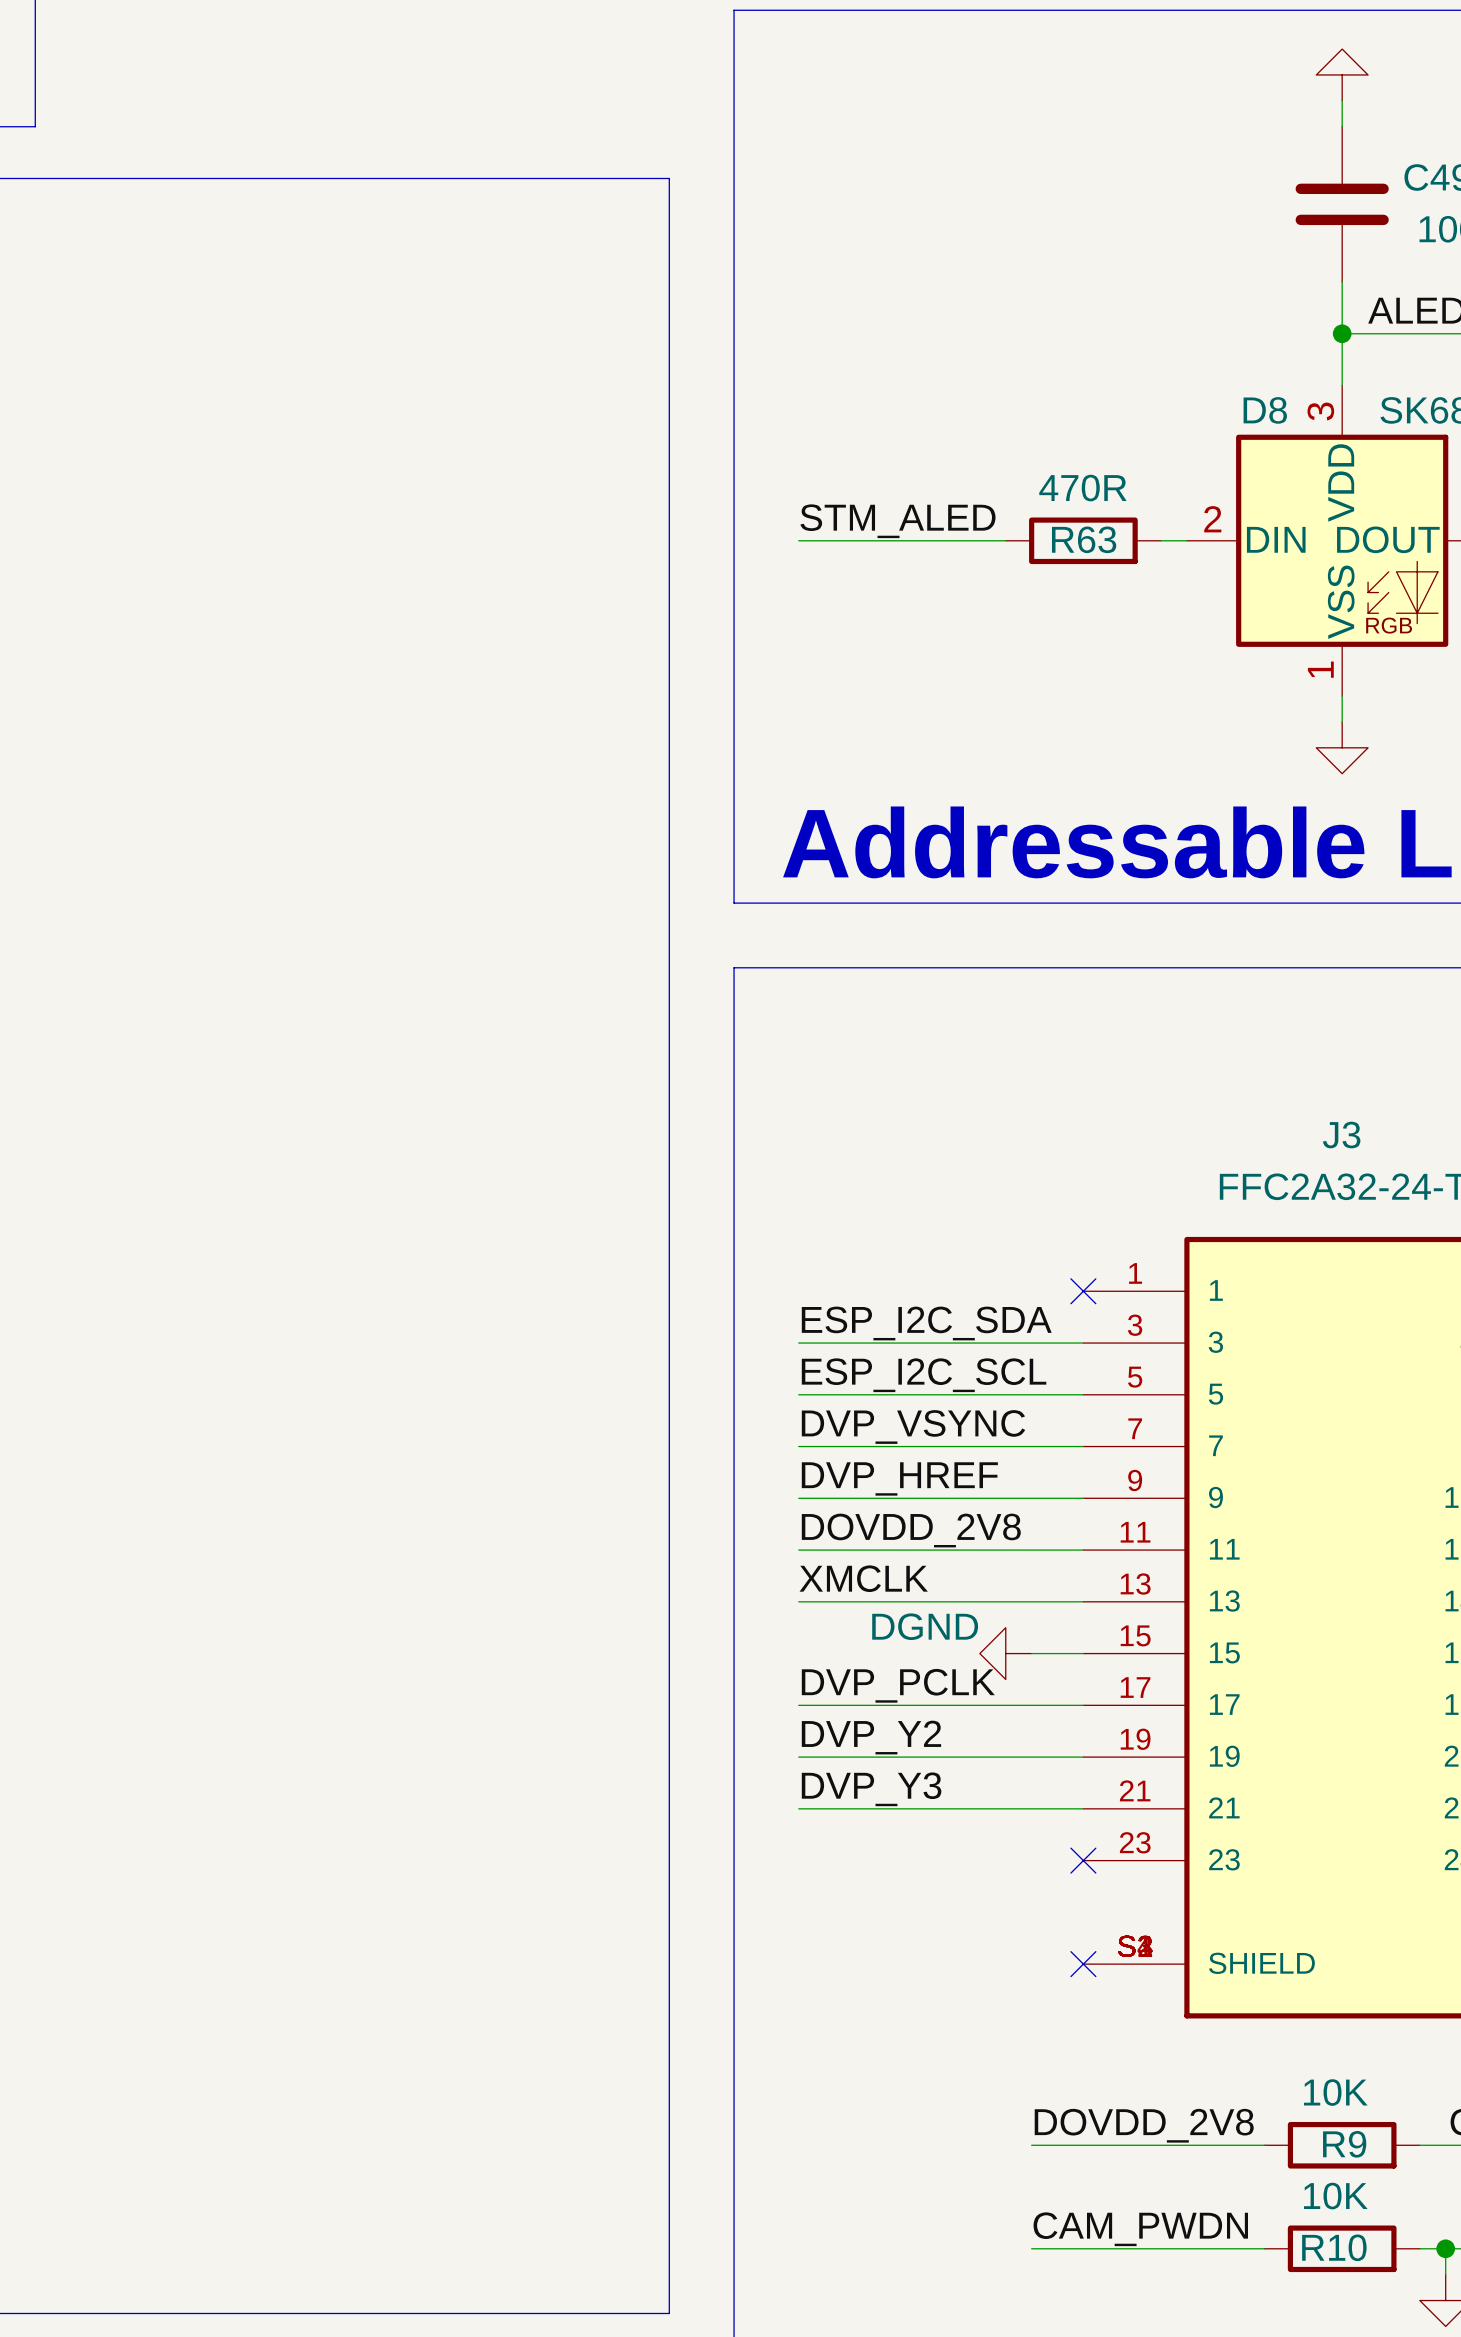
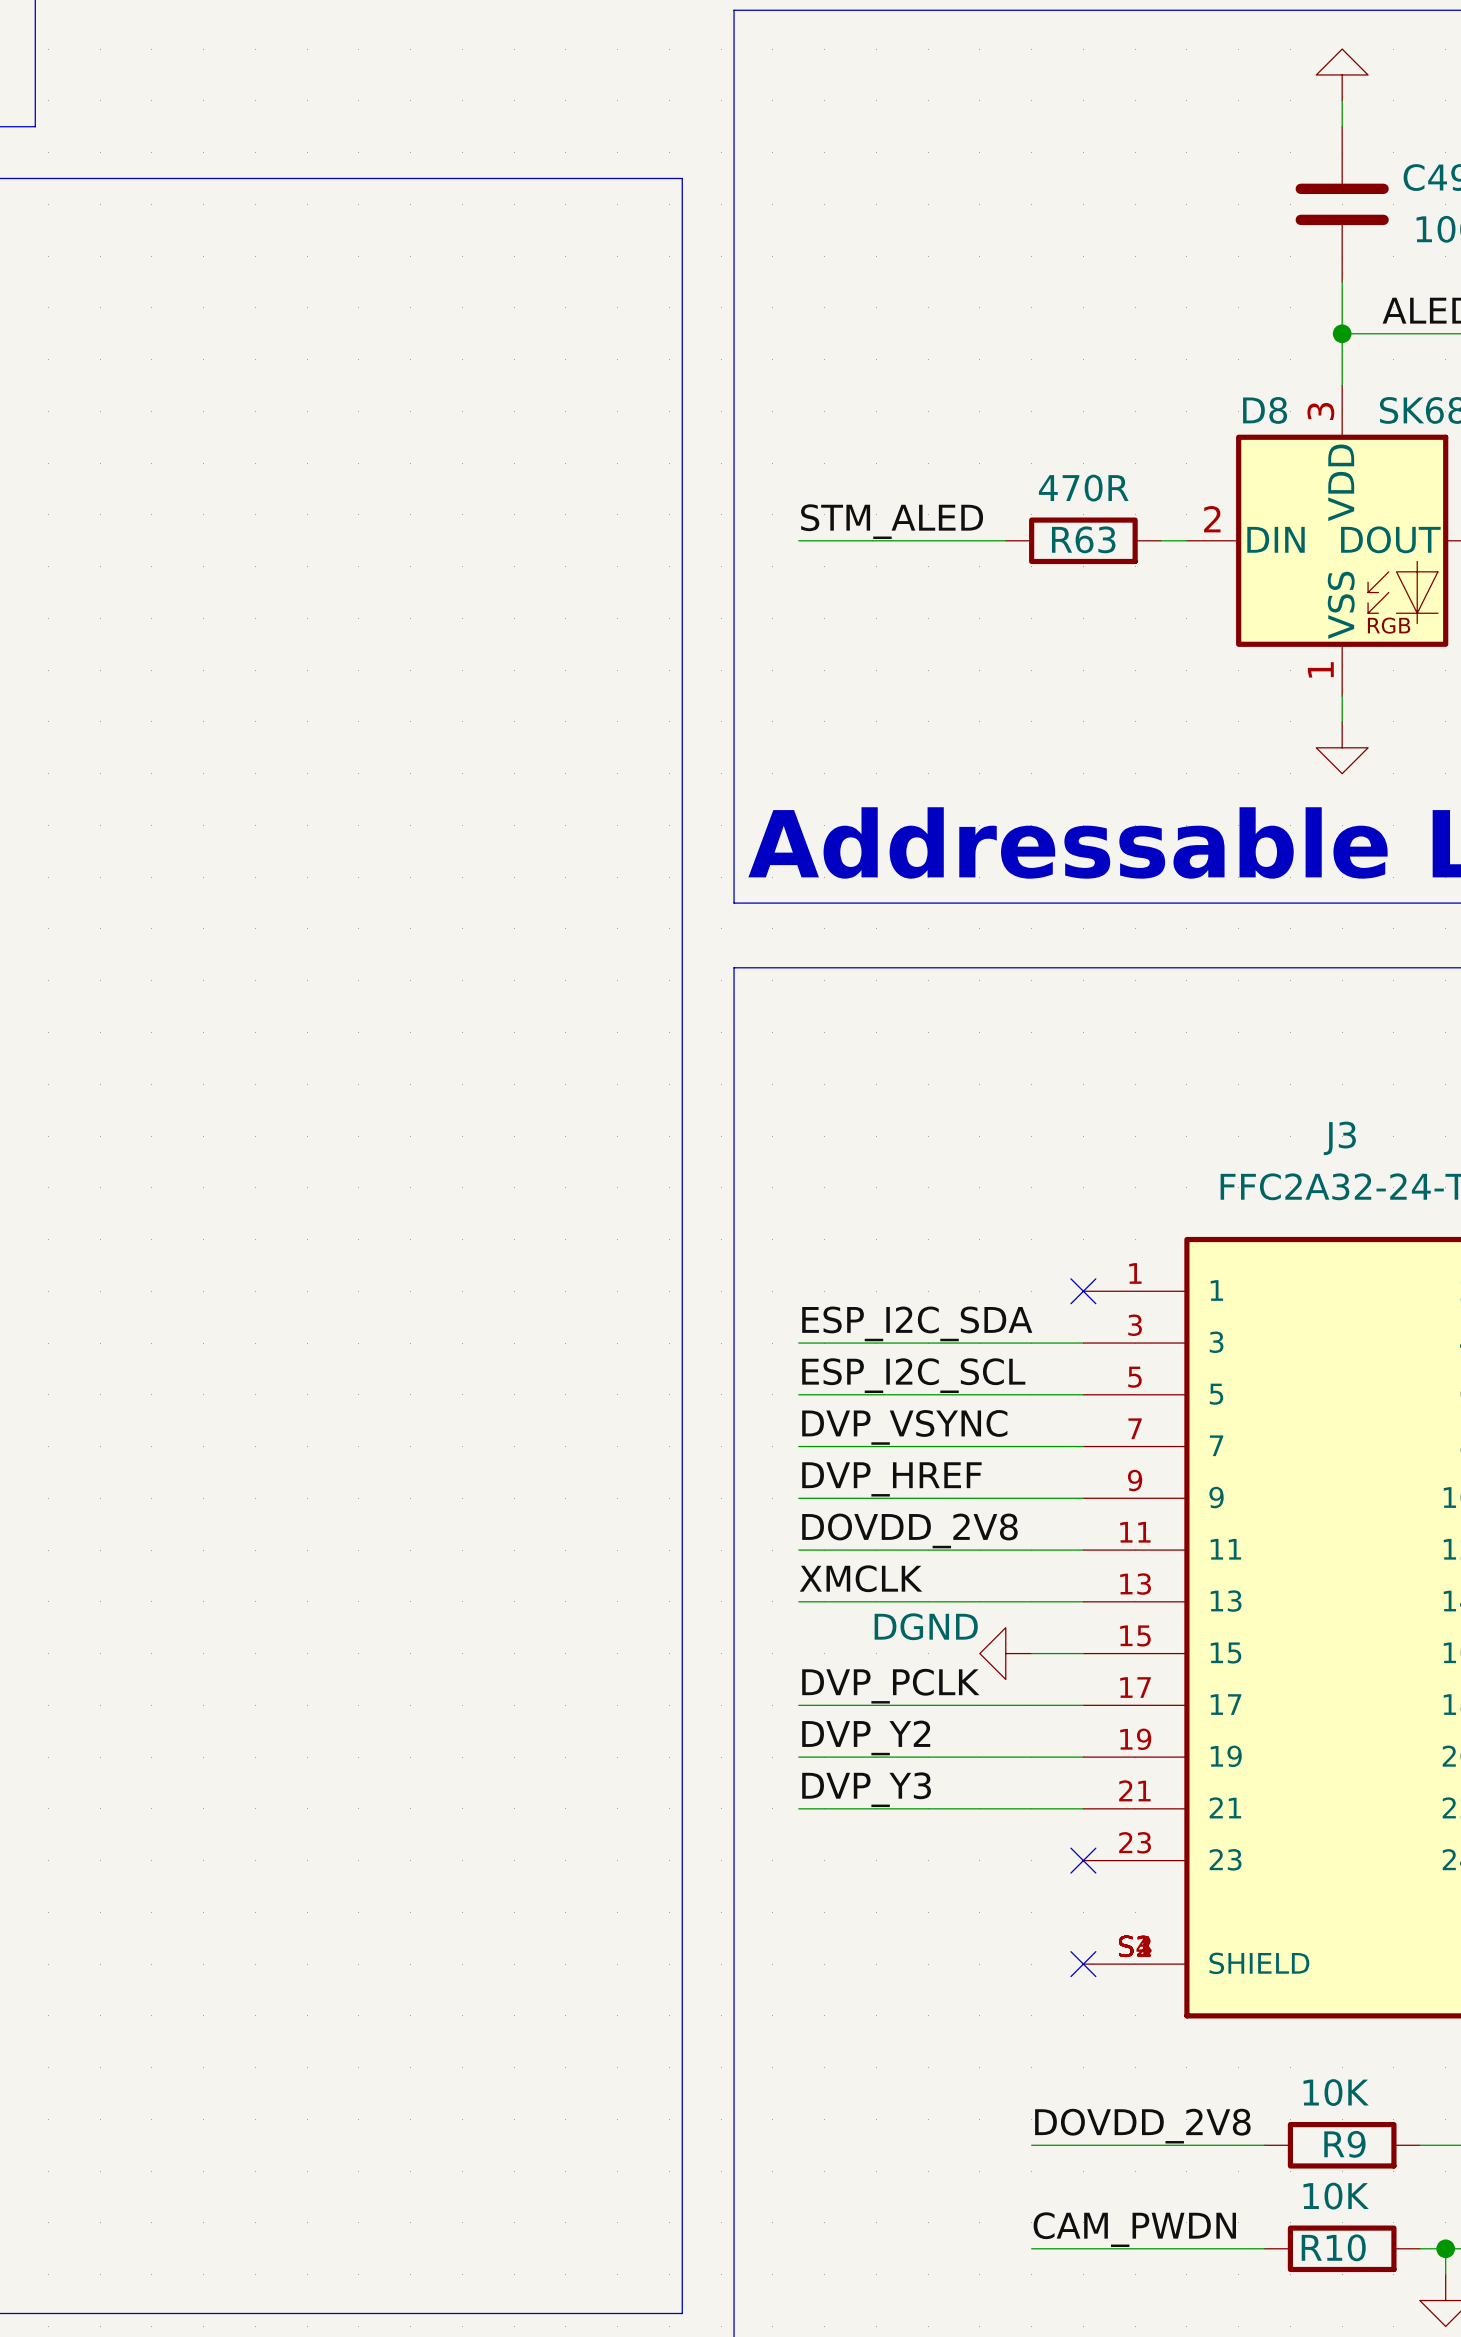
line: (669, 178) (669, 2313) -> (669, 178) (682, 178) (682, 2313) (669, 2313)

